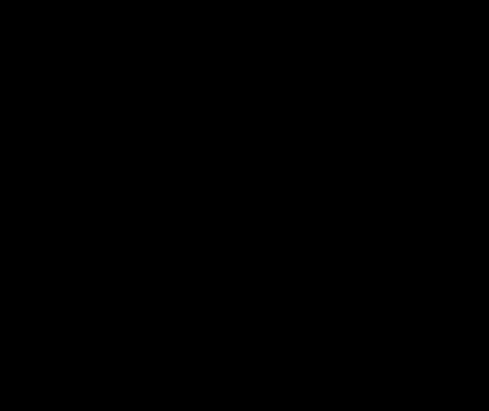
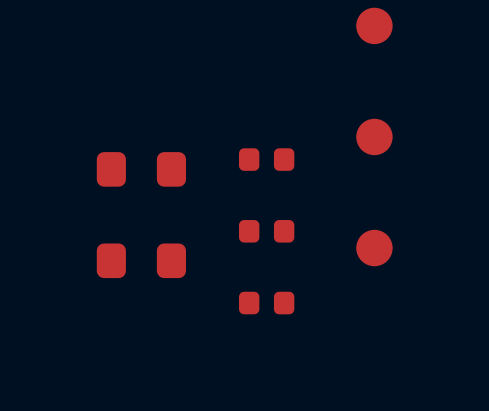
part: none -> (374, 25)
part: none -> (374, 136)
part: none -> (266, 159)
part: none -> (141, 169)
part: none -> (266, 231)
part: none -> (374, 248)
part: none -> (141, 260)
part: none -> (266, 303)

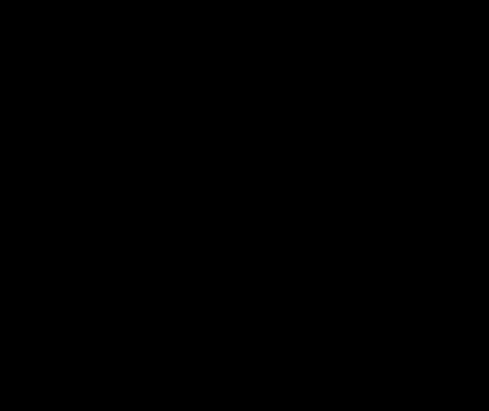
part: (374, 25) -> none
part: (374, 136) -> none
part: (266, 159) -> none
part: (141, 169) -> none
part: (266, 231) -> none
part: (374, 248) -> none
part: (141, 260) -> none
part: (266, 303) -> none

